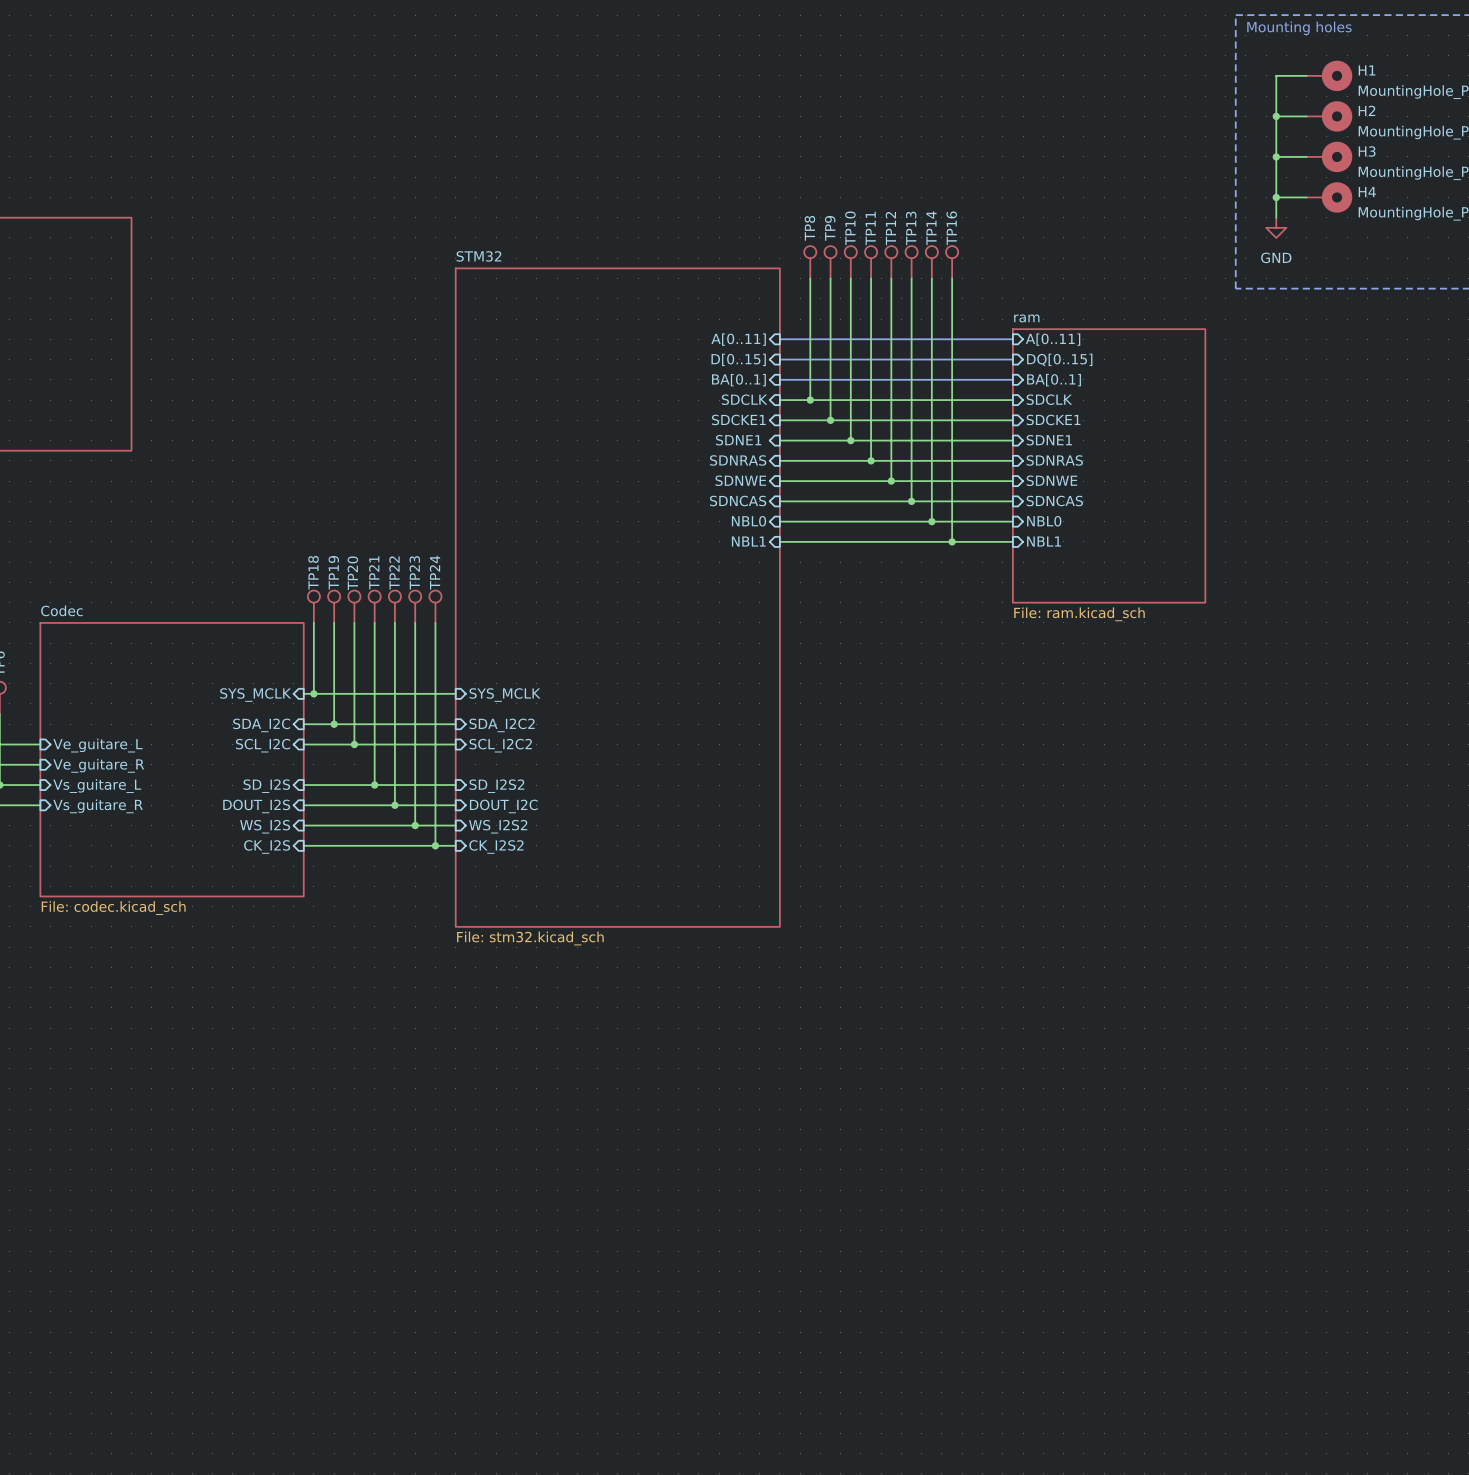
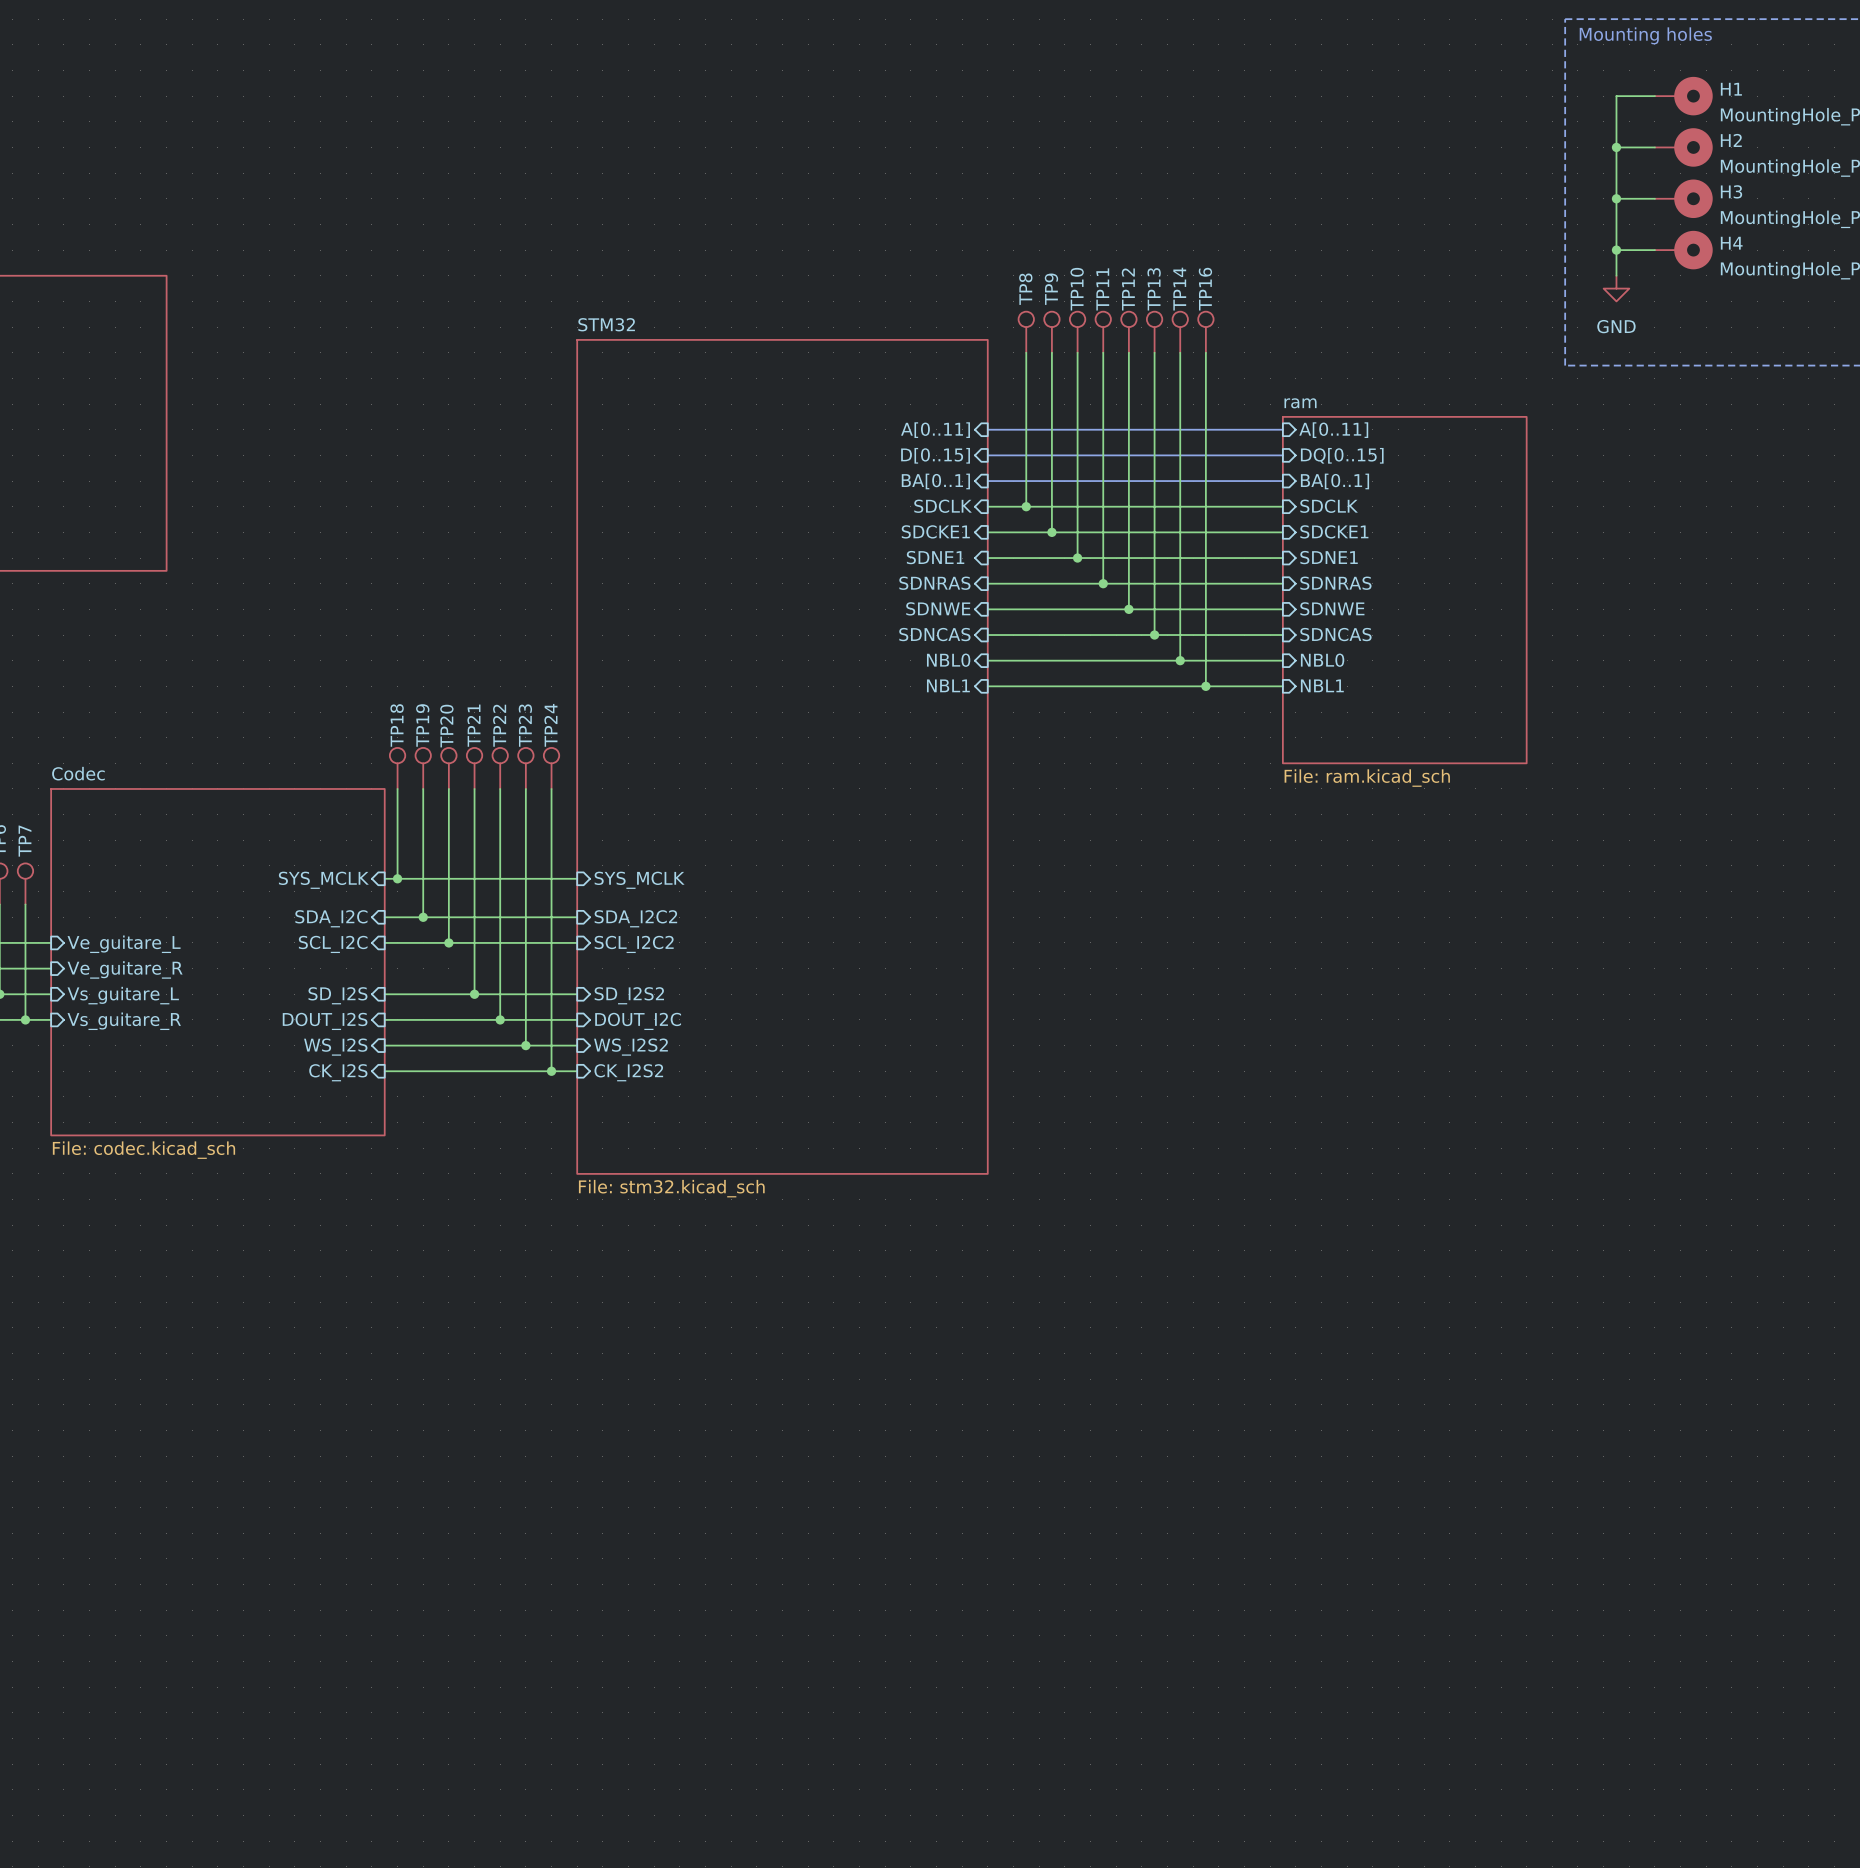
TP7: none -> (25, 883)
wire: none -> (25, 904) (25, 1019)
junction: none -> (25, 1019)

